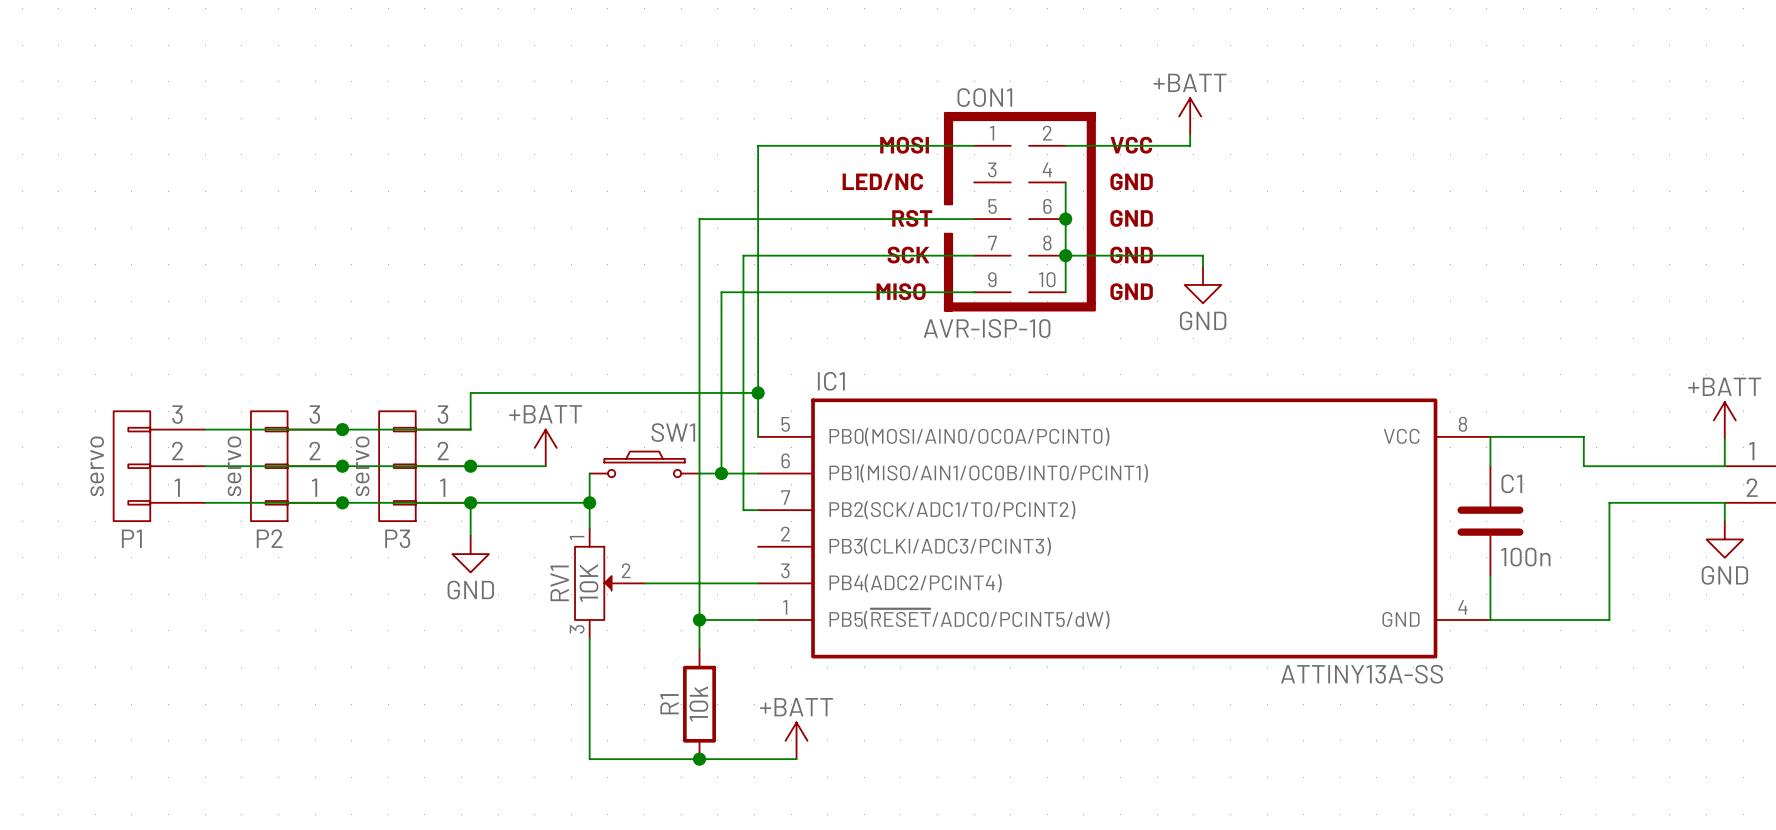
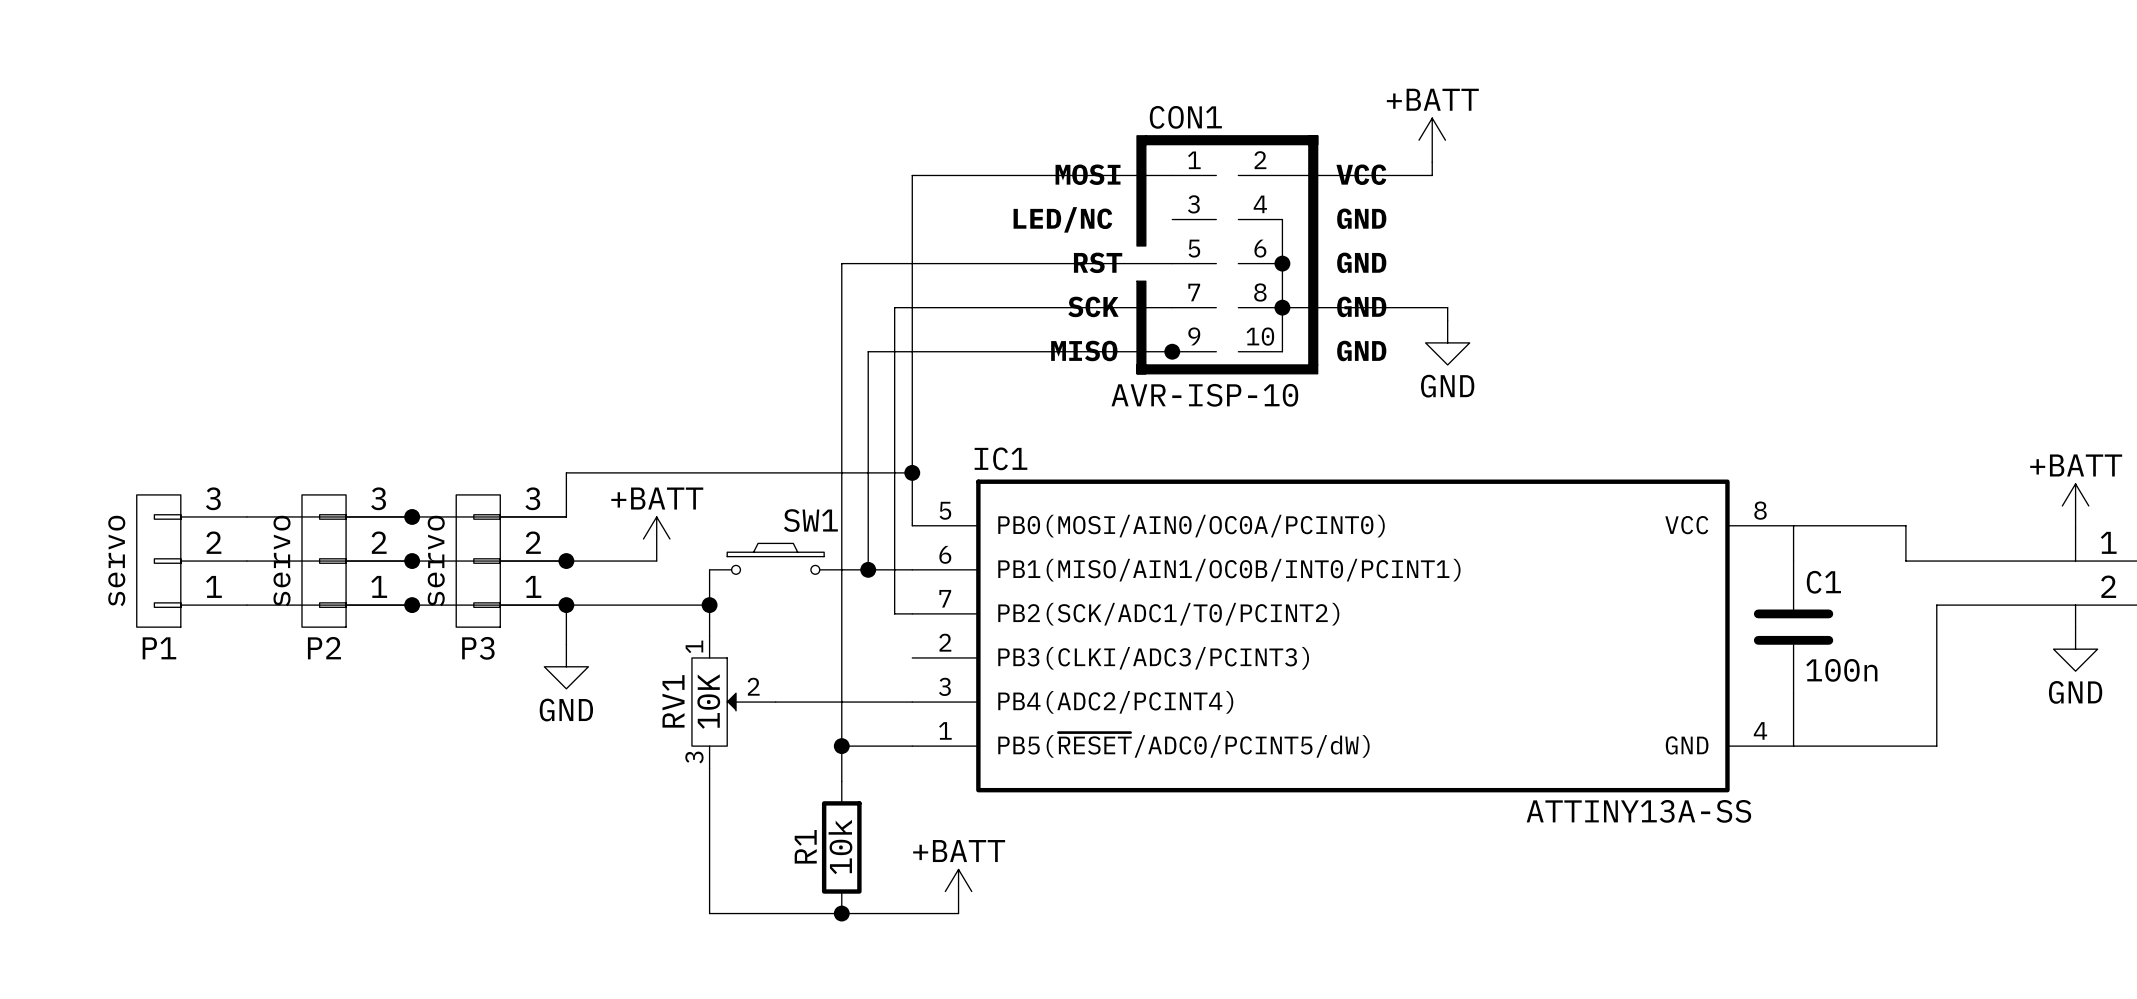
junction: none -> (1172, 351)

